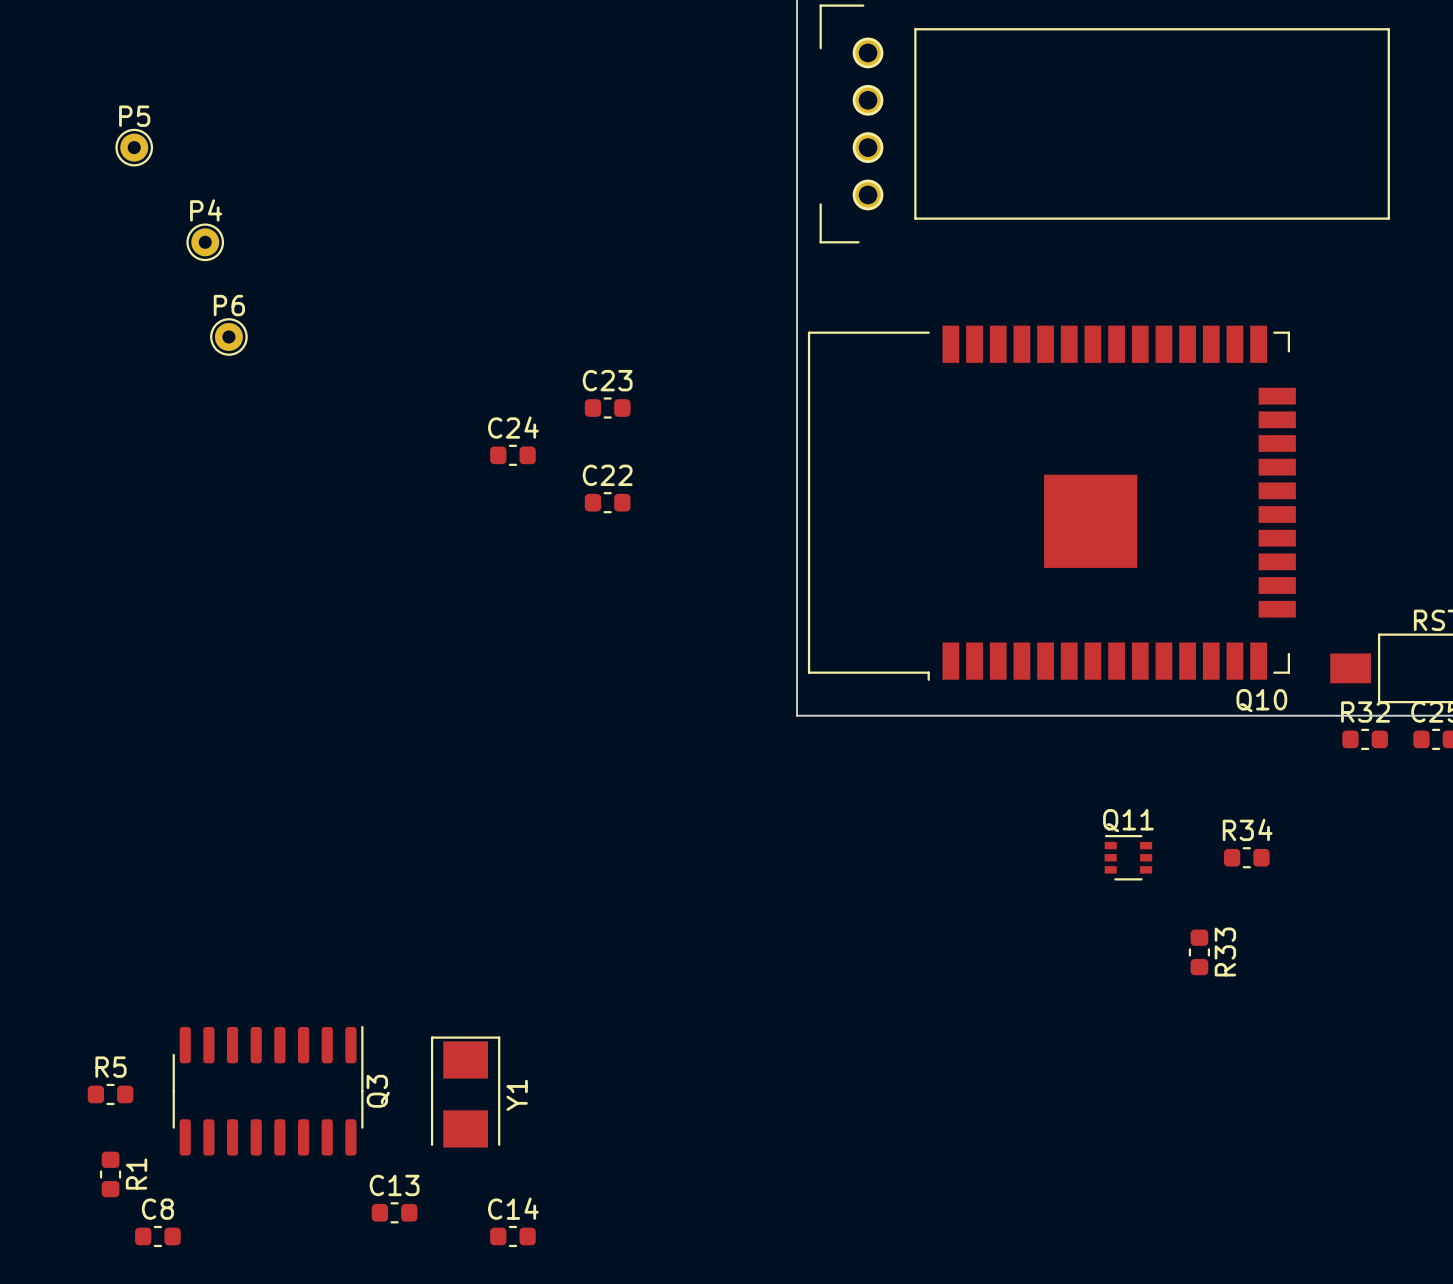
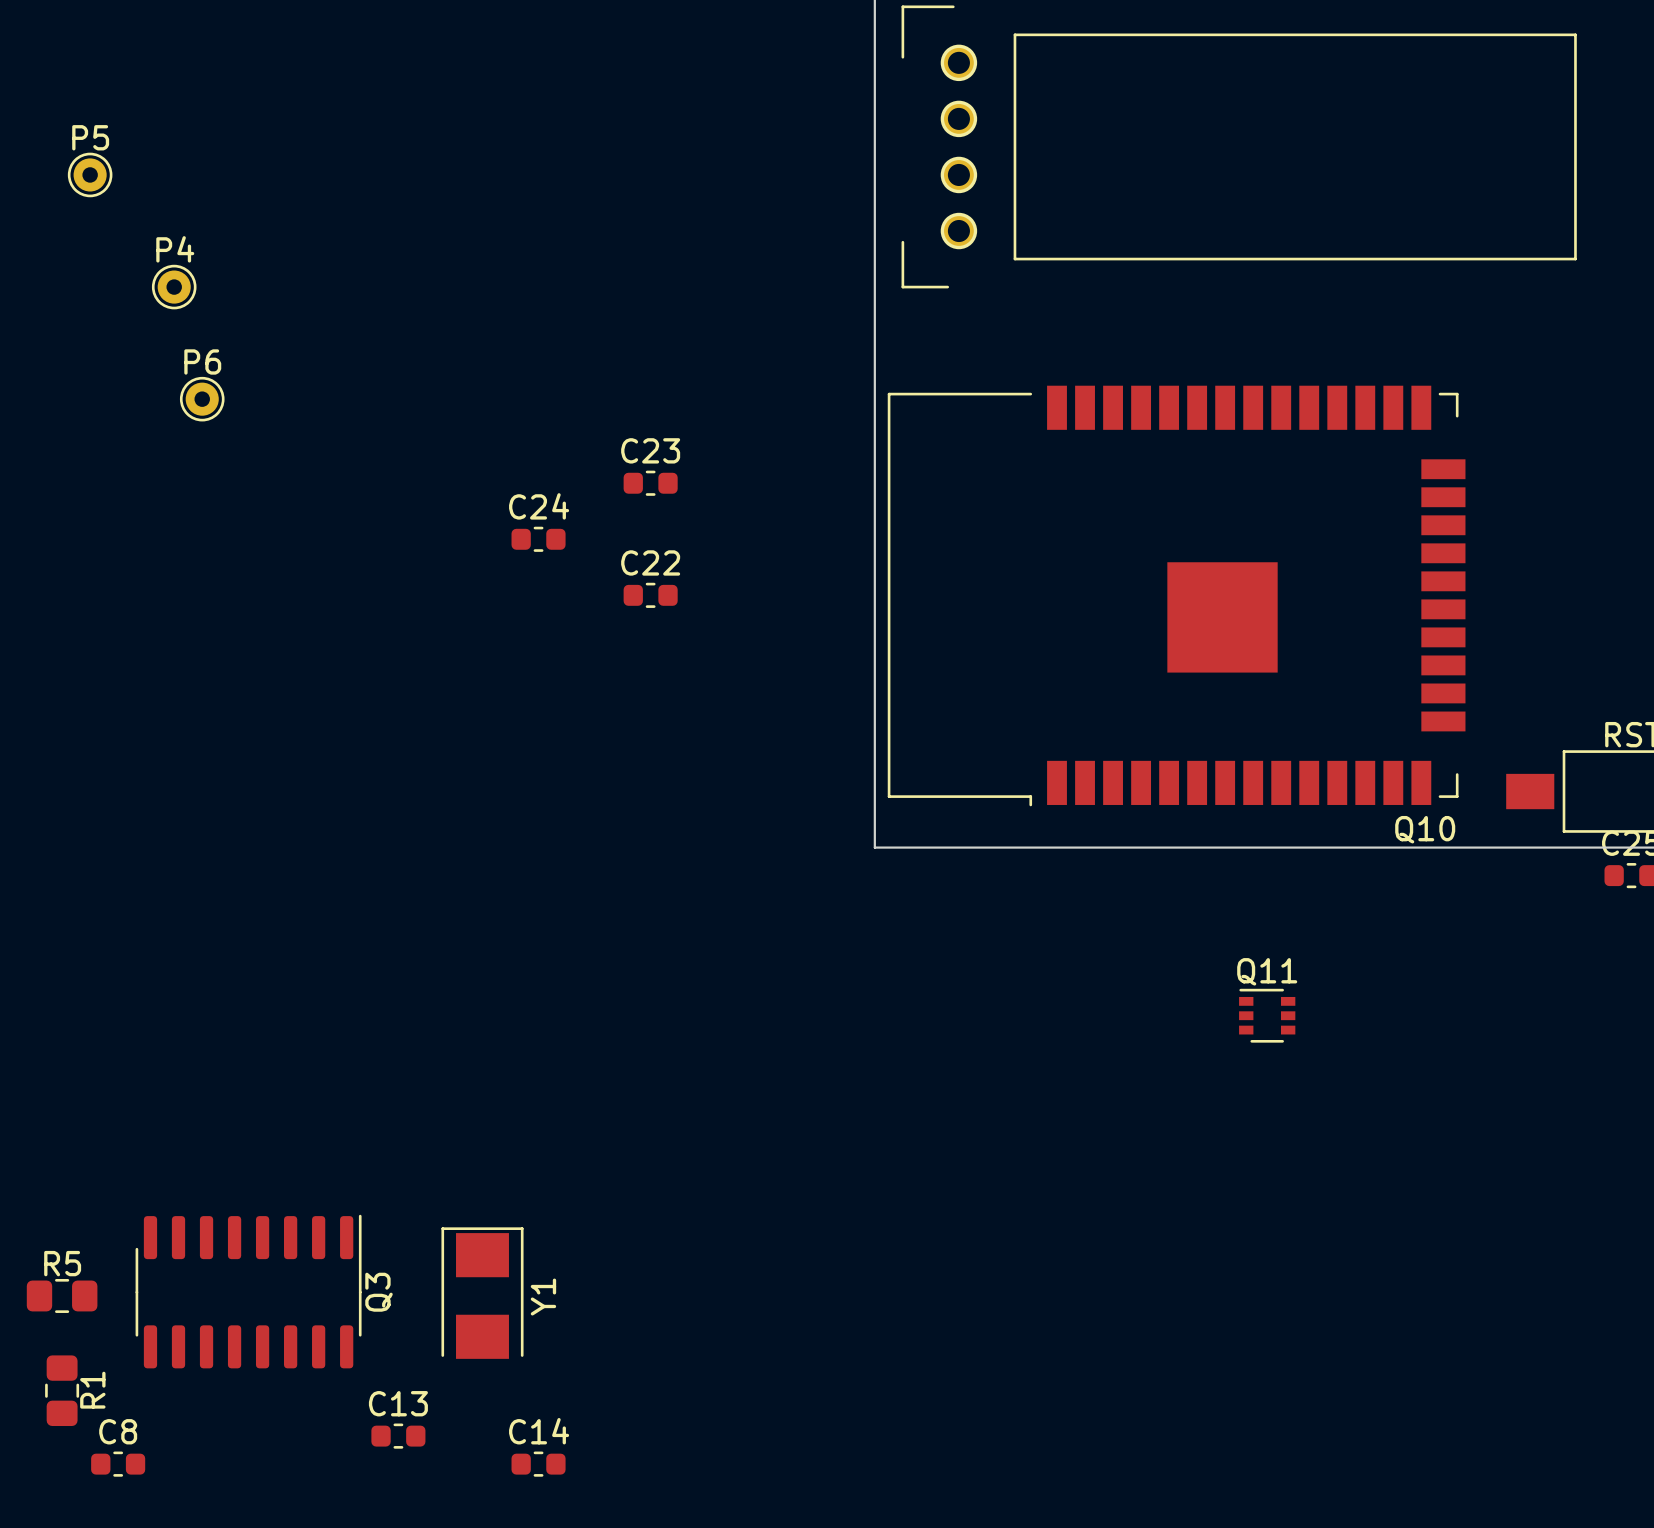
R32: (1365, 739) -> none
R34: (1246, 857) -> none
R33: (1199, 952) -> none
R5 footprint: [87, 1083, 134, 1106] -> [26, 1278, 98, 1313]
R1 footprint: [99, 1151, 122, 1198] -> [45, 1355, 80, 1427]

